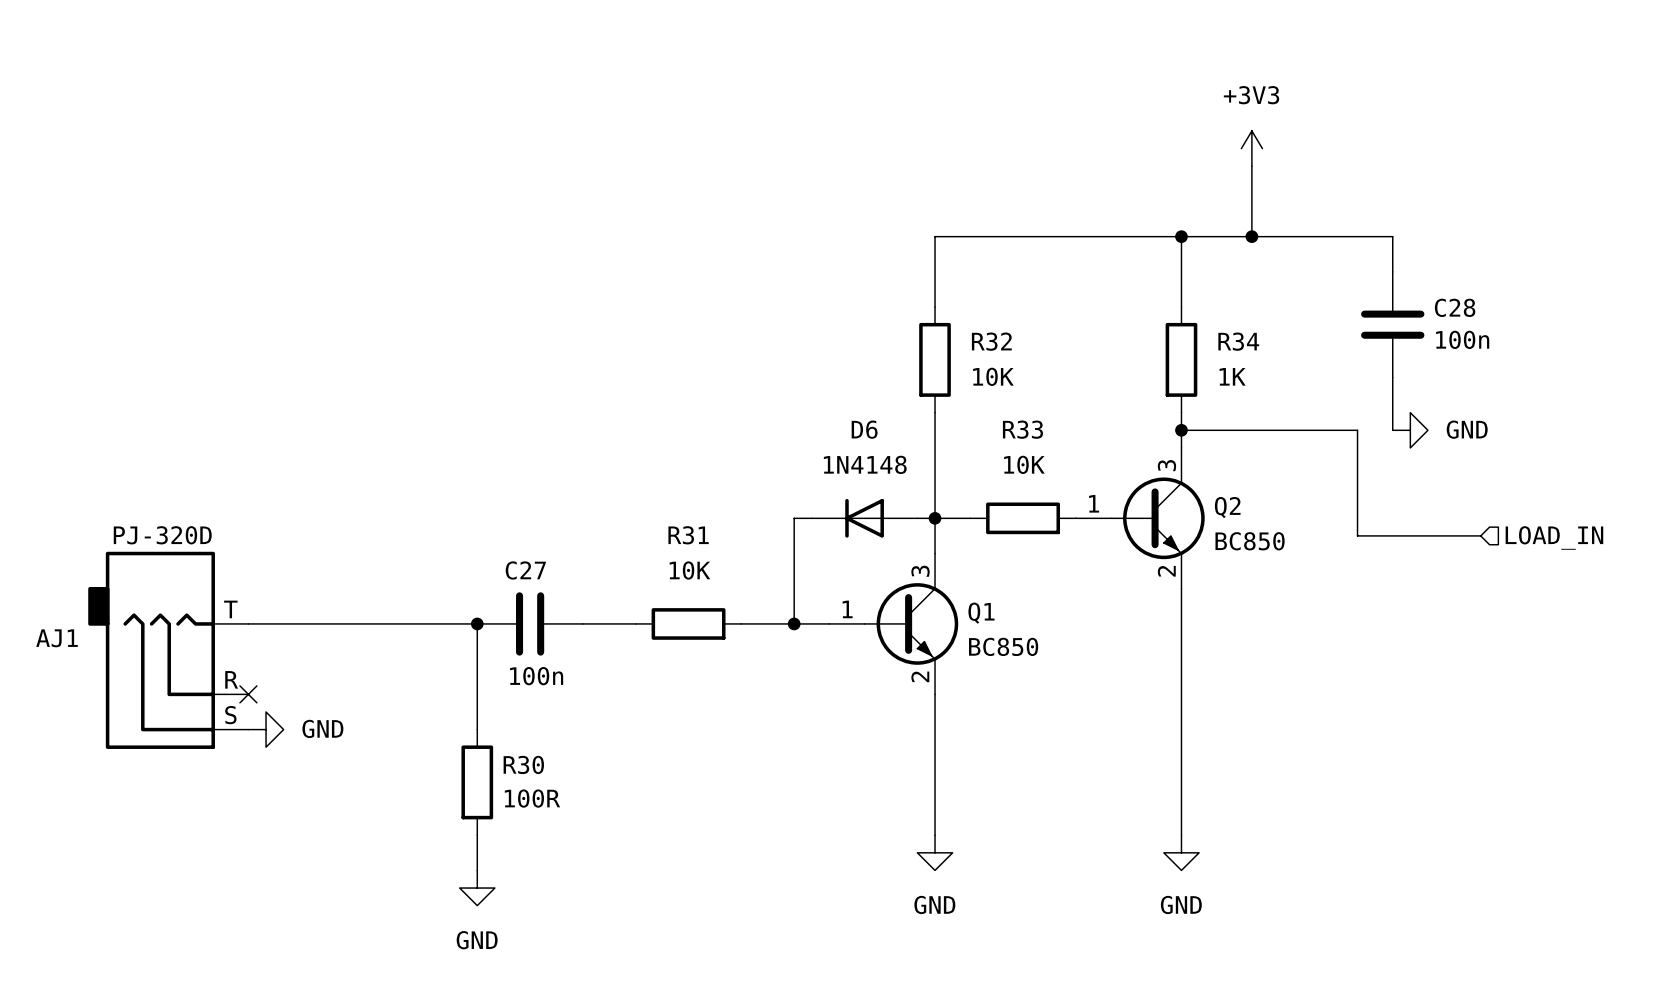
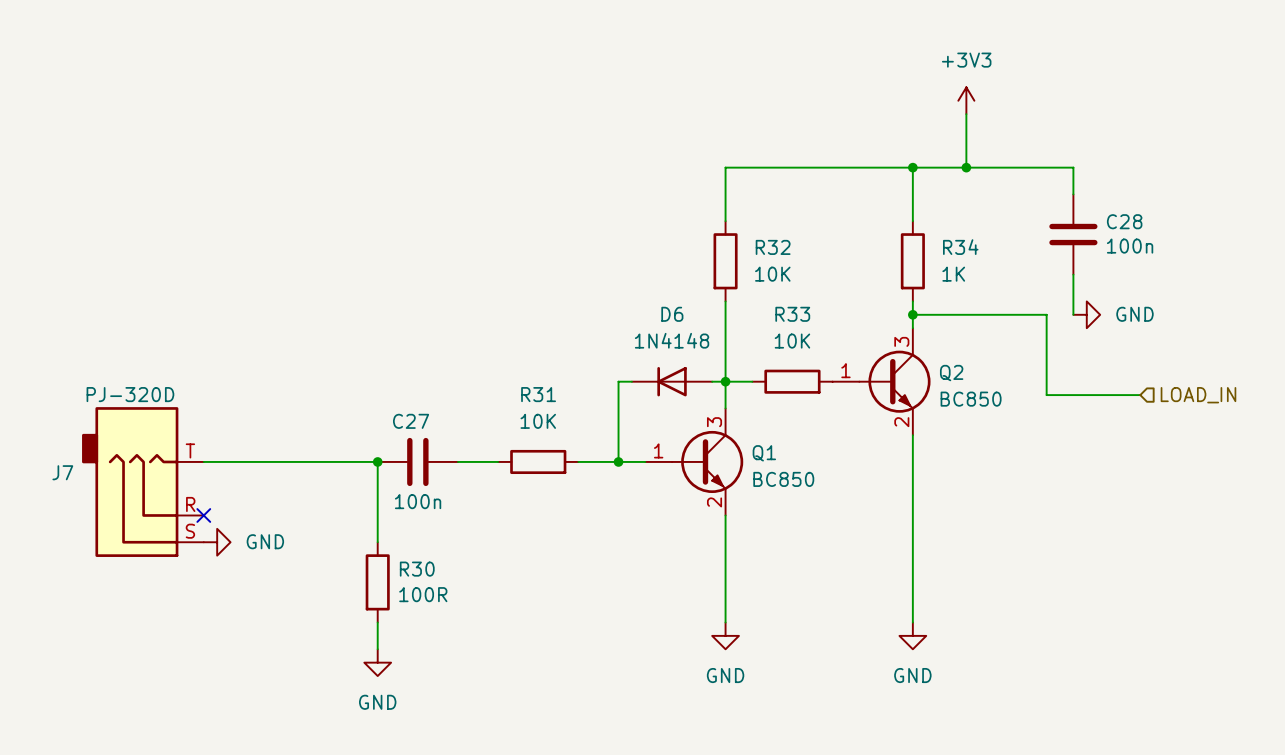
AJ1 name: AJ1 (57, 638) -> J7 (62, 472)

